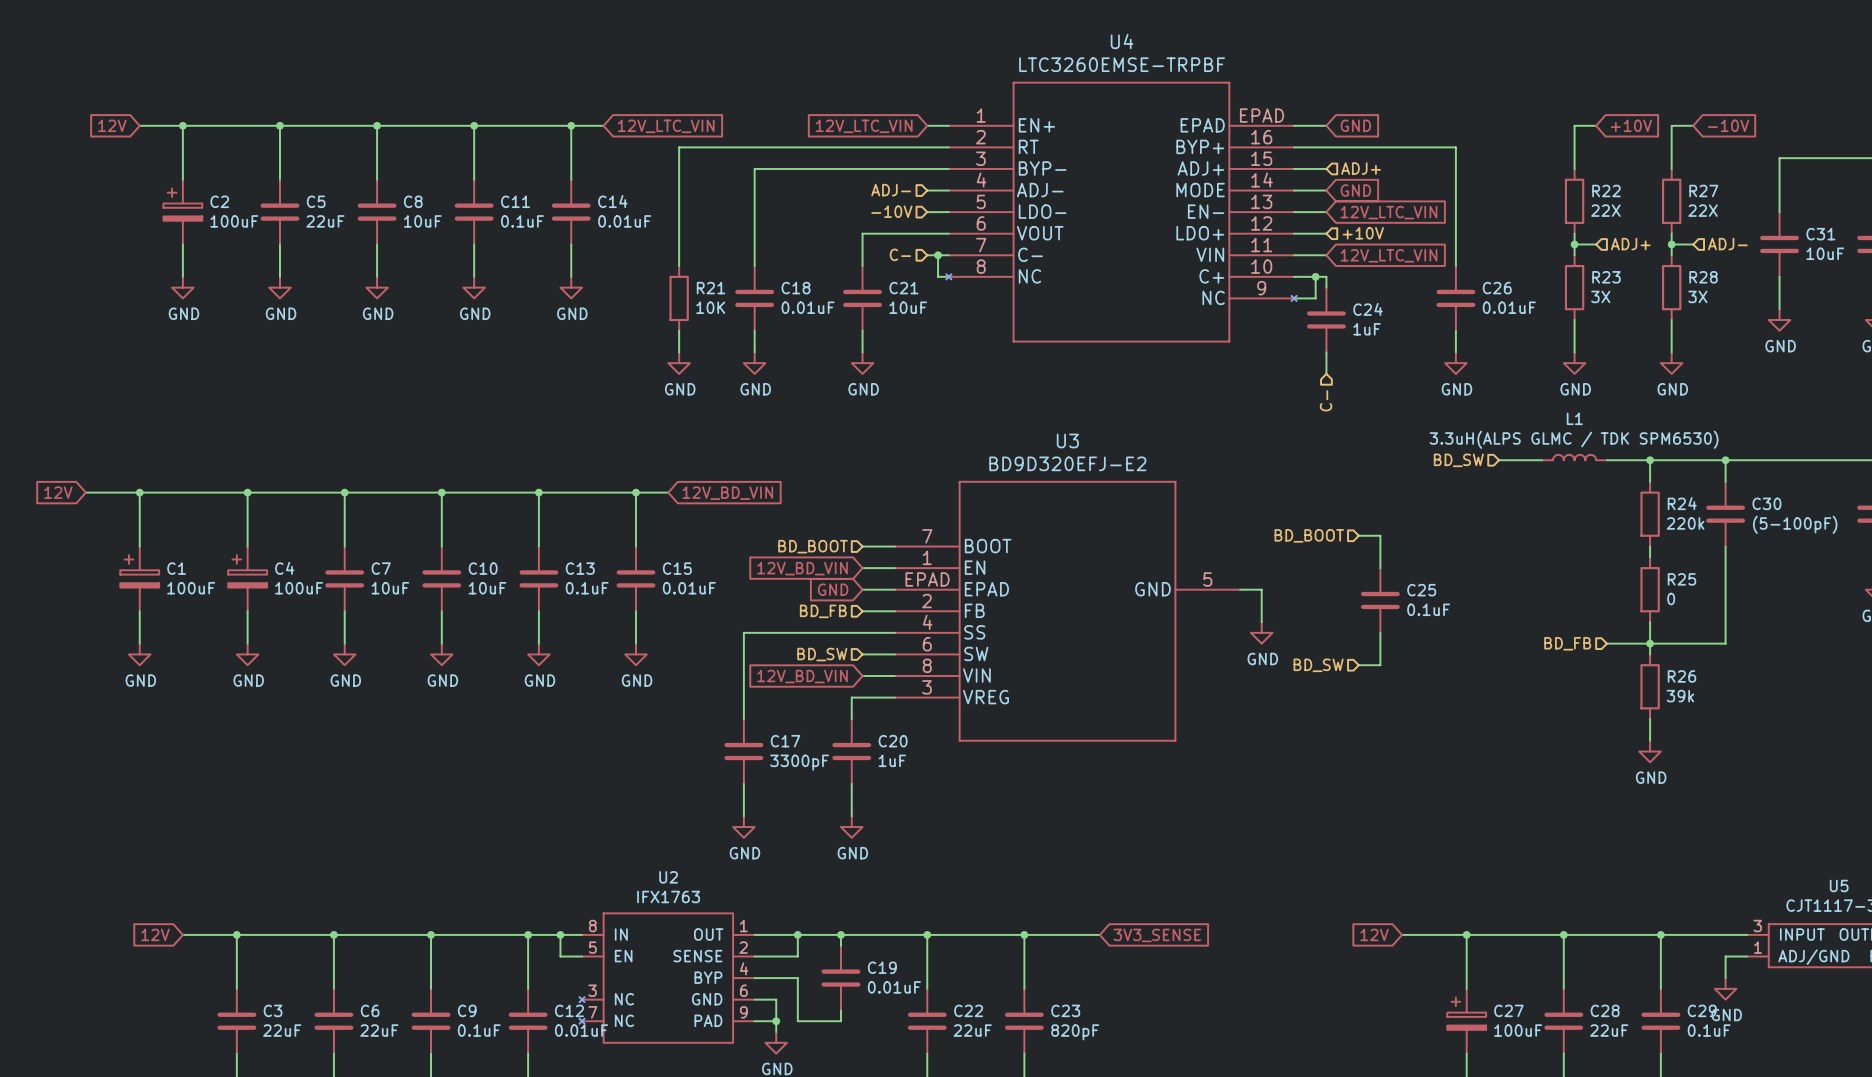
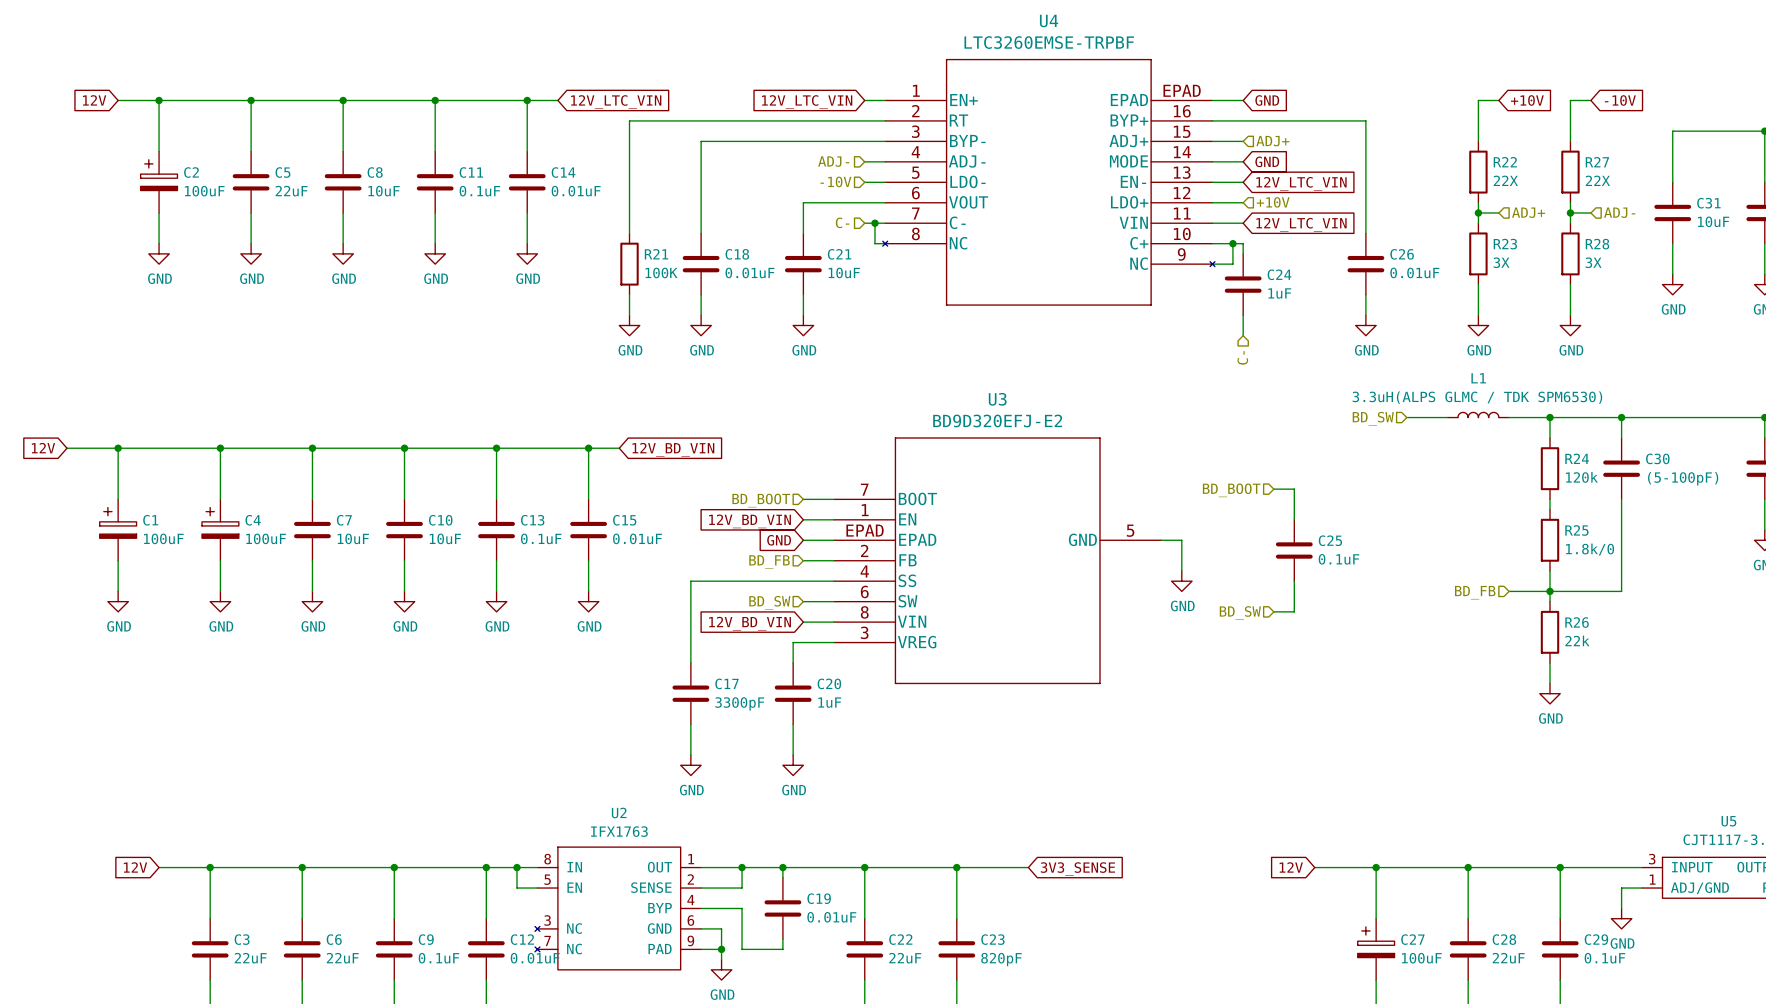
R21 value: 10K (710, 307) -> 100K (661, 272)
R24 value: 220k (1685, 523) -> 120k (1581, 477)
R25 value: 0 (1671, 599) -> 1.8k/0 (1590, 549)
R26 value: 39k (1680, 696) -> 22k (1577, 640)

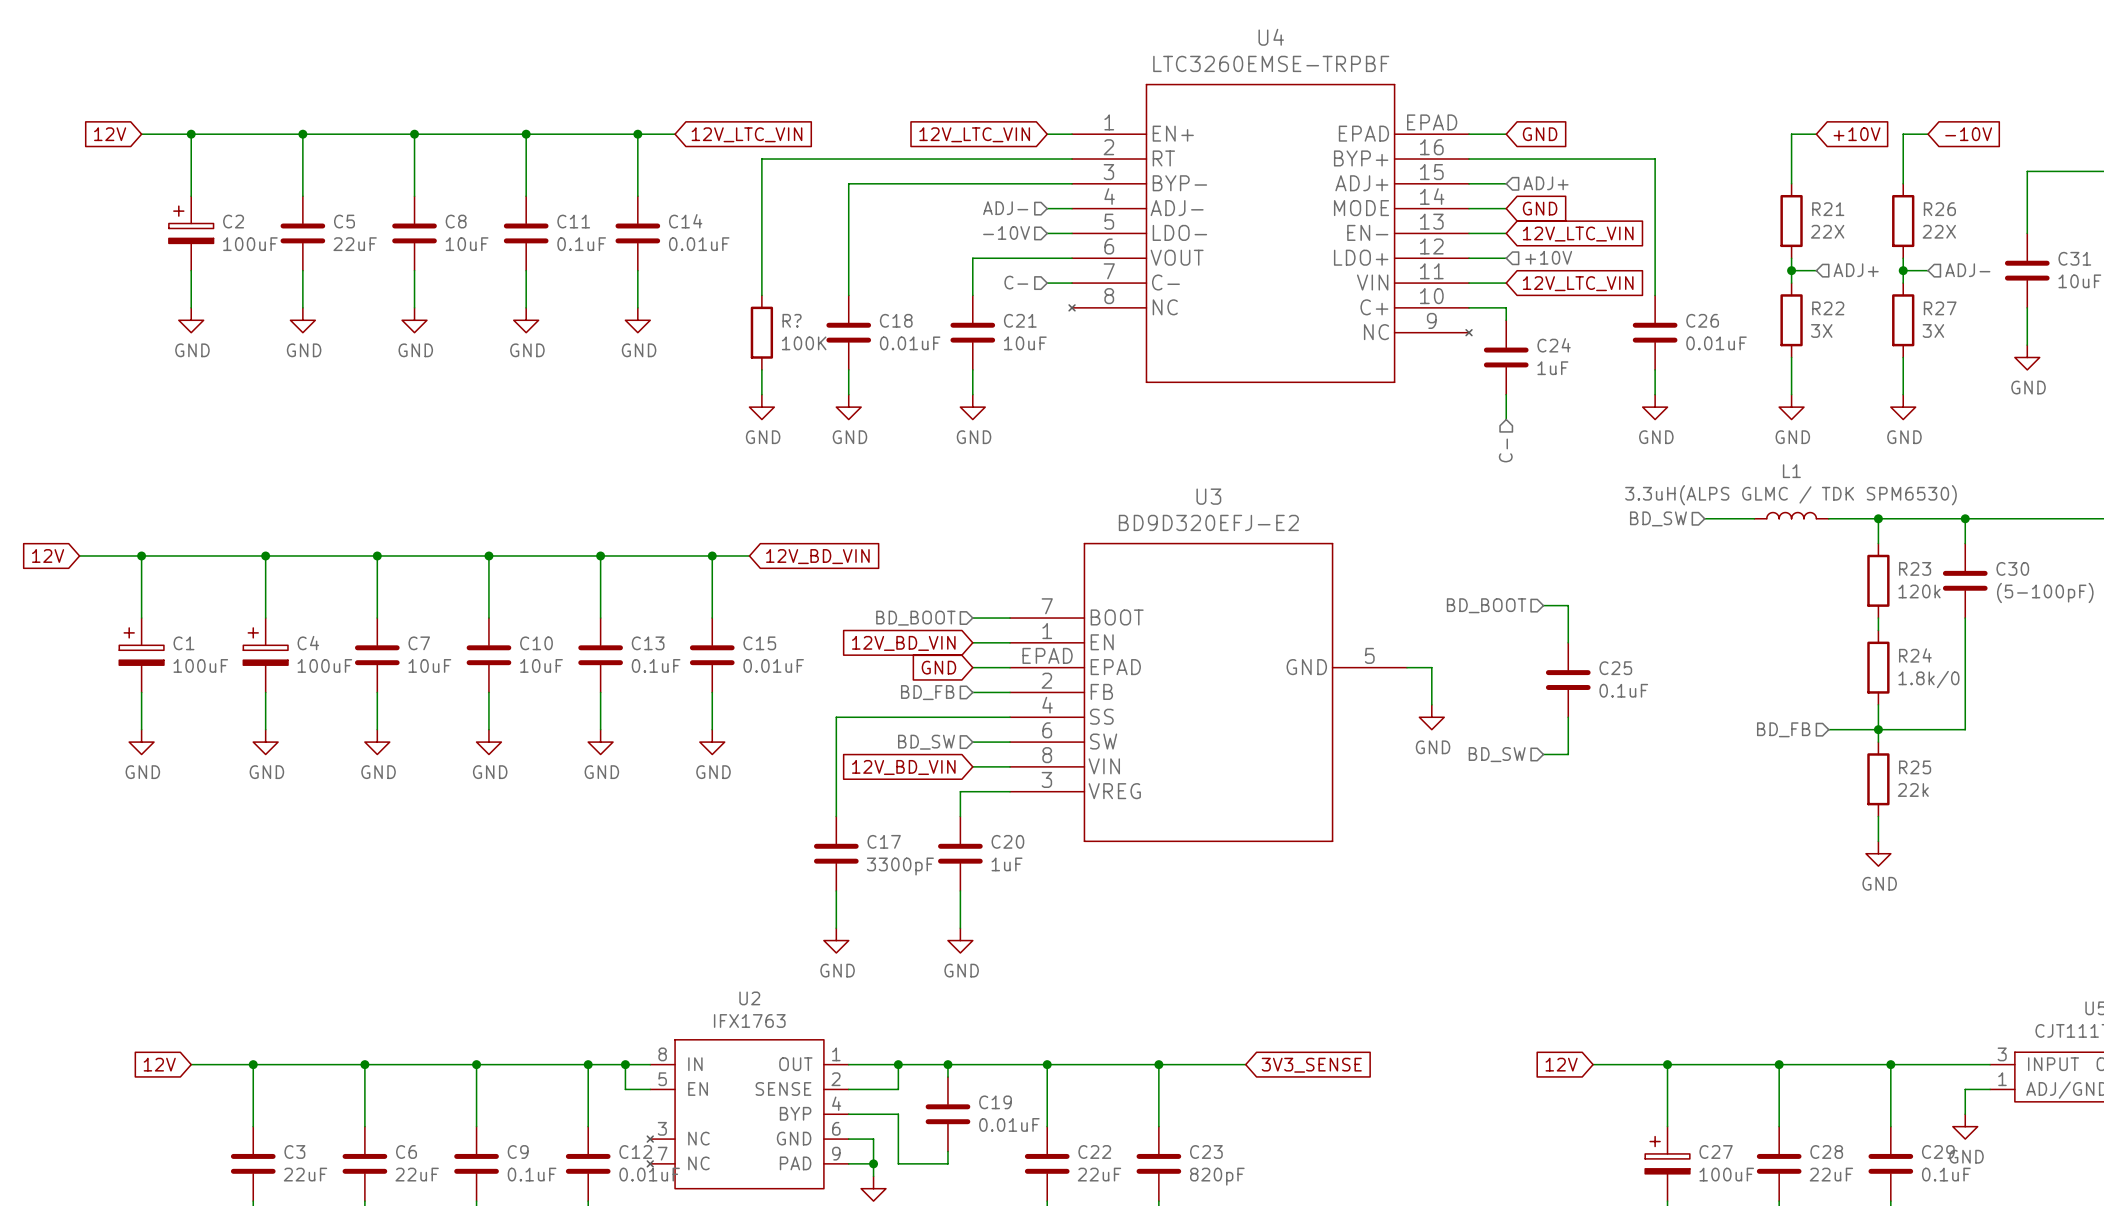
R22 name: R22 (1505, 162) -> R21 (1828, 209)
R27 name: R27 (1597, 162) -> R26 (1939, 209)
wire: (874, 223) (874, 243) (885, 243) -> none
junction: (874, 223) -> none
wire: (1232, 243) (1232, 264) (1212, 264) -> none
junction: (1232, 243) -> none
R23 name: R23 (1505, 244) -> R22 (1828, 308)
R28 name: R28 (1597, 244) -> R27 (1940, 308)
R21 name: R21 (656, 254) -> R? (792, 320)
R24 name: R24 (1577, 458) -> R23 (1915, 568)
R25 name: R25 (1576, 530) -> R24 (1915, 655)
R26 name: R26 (1577, 622) -> R25 (1915, 767)

